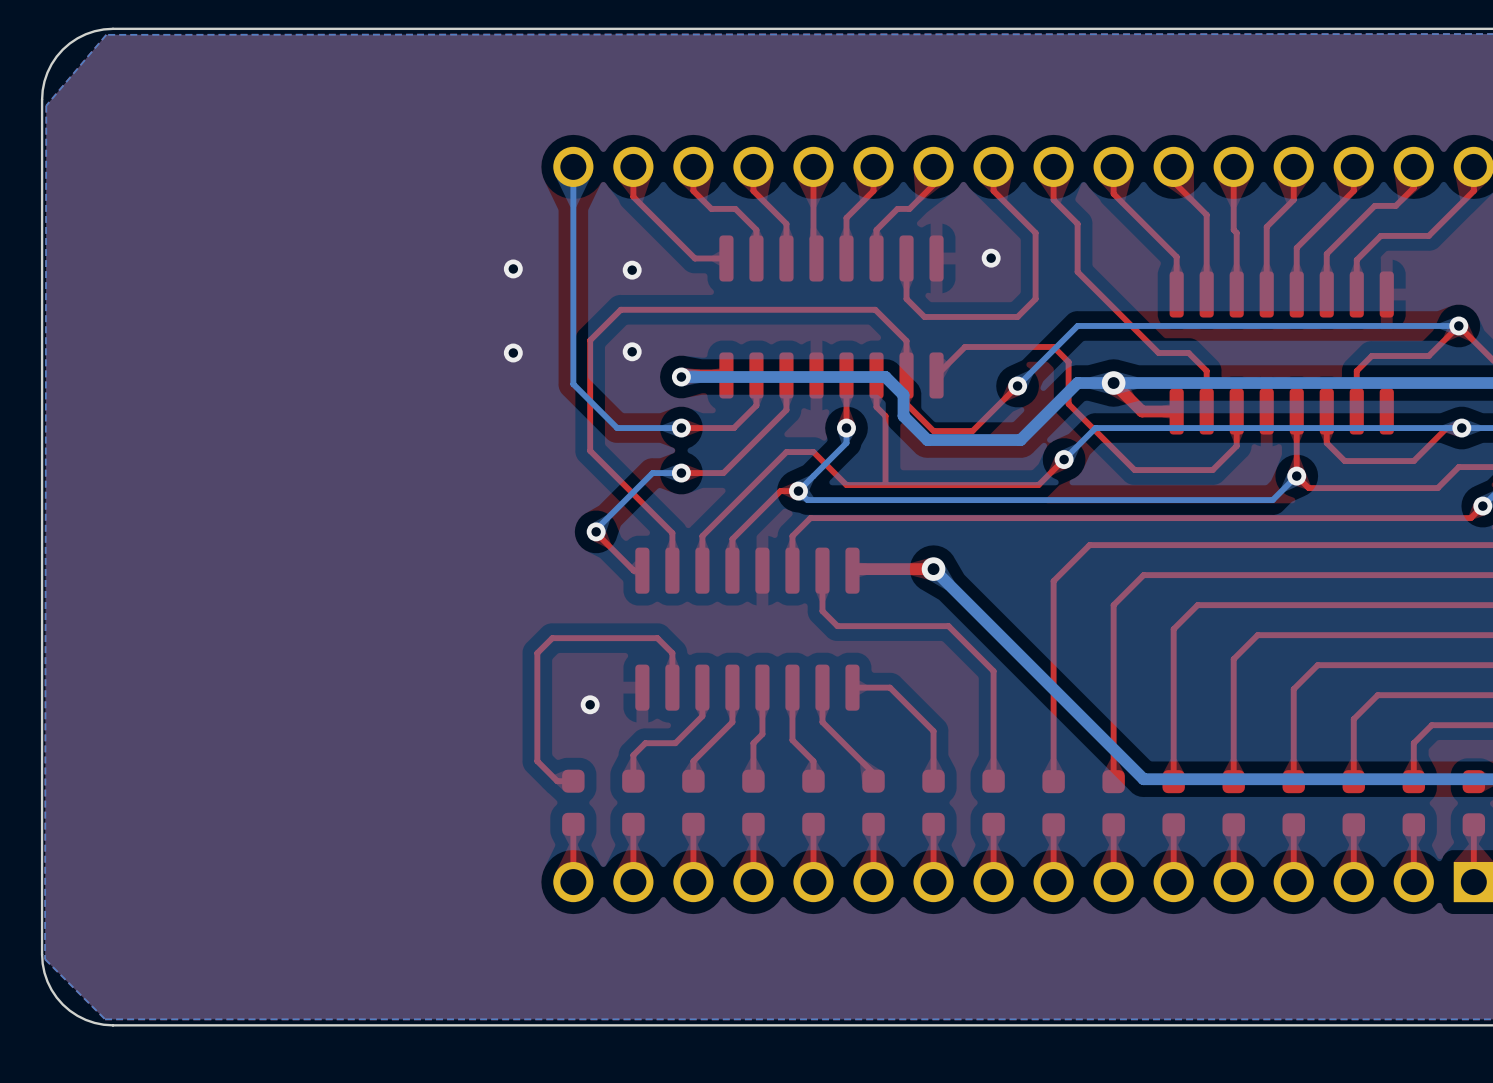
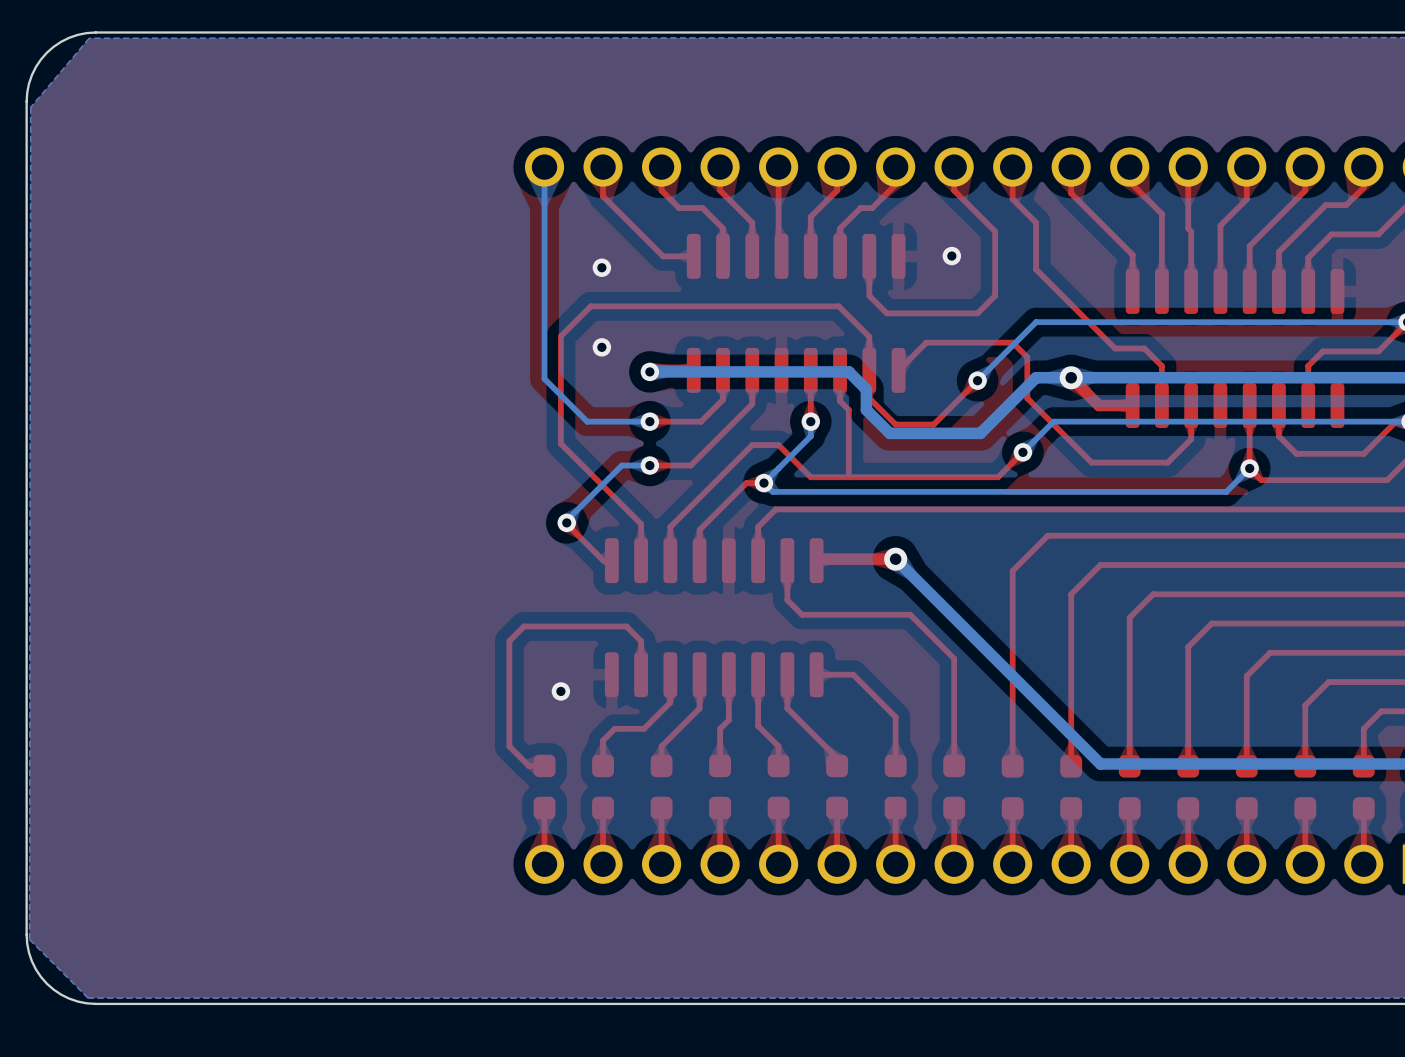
via: (513, 268) -> none
via: (513, 353) -> none

